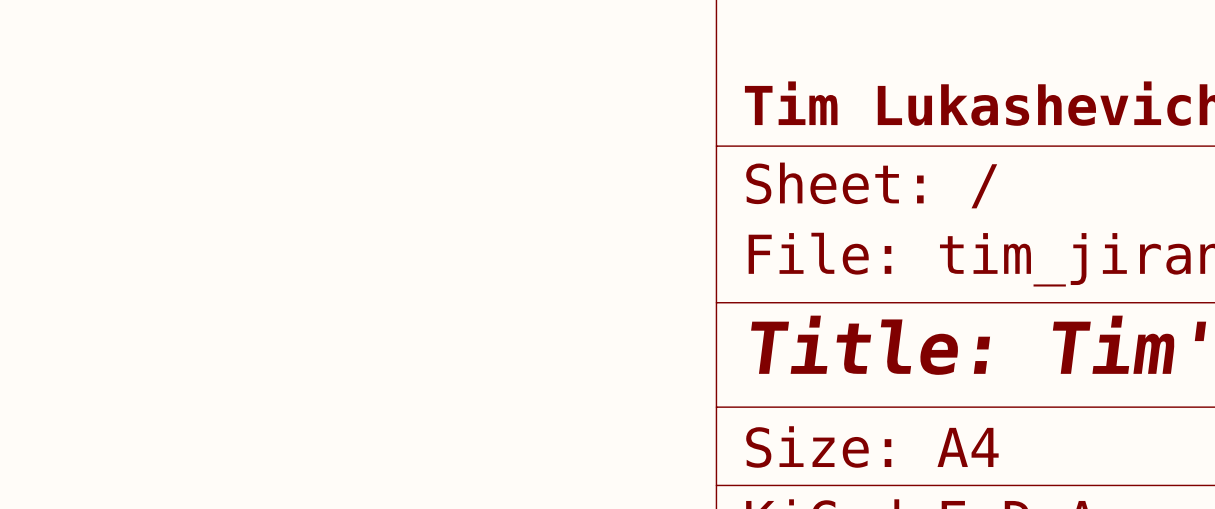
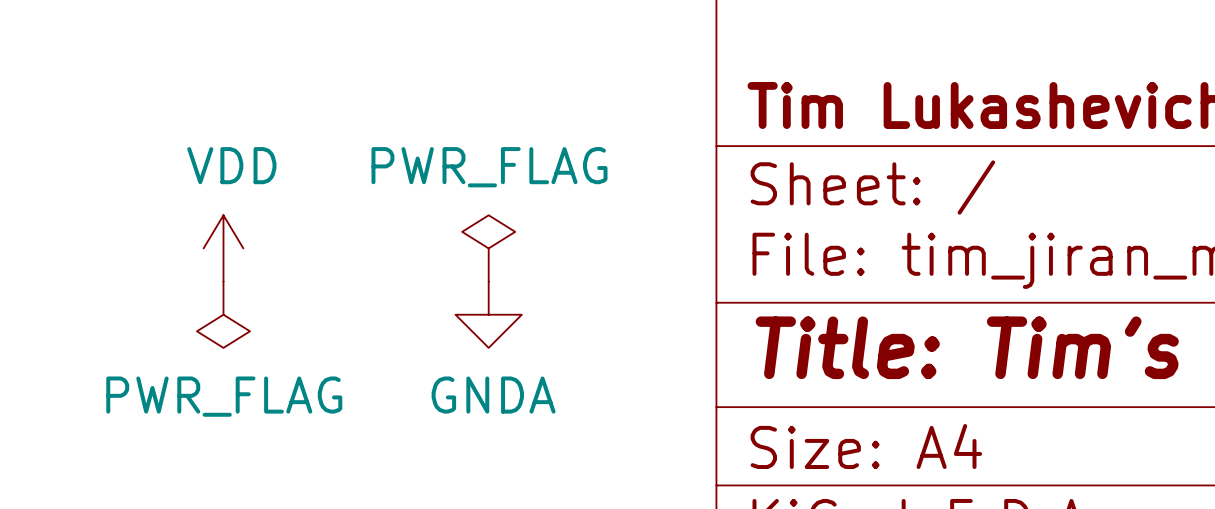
power symbol: none -> VDD (223, 248)
power symbol: none -> PWR_FLAG (488, 248)
power symbol: none -> PWR_FLAG (223, 314)
power symbol: none -> GNDA (488, 314)

